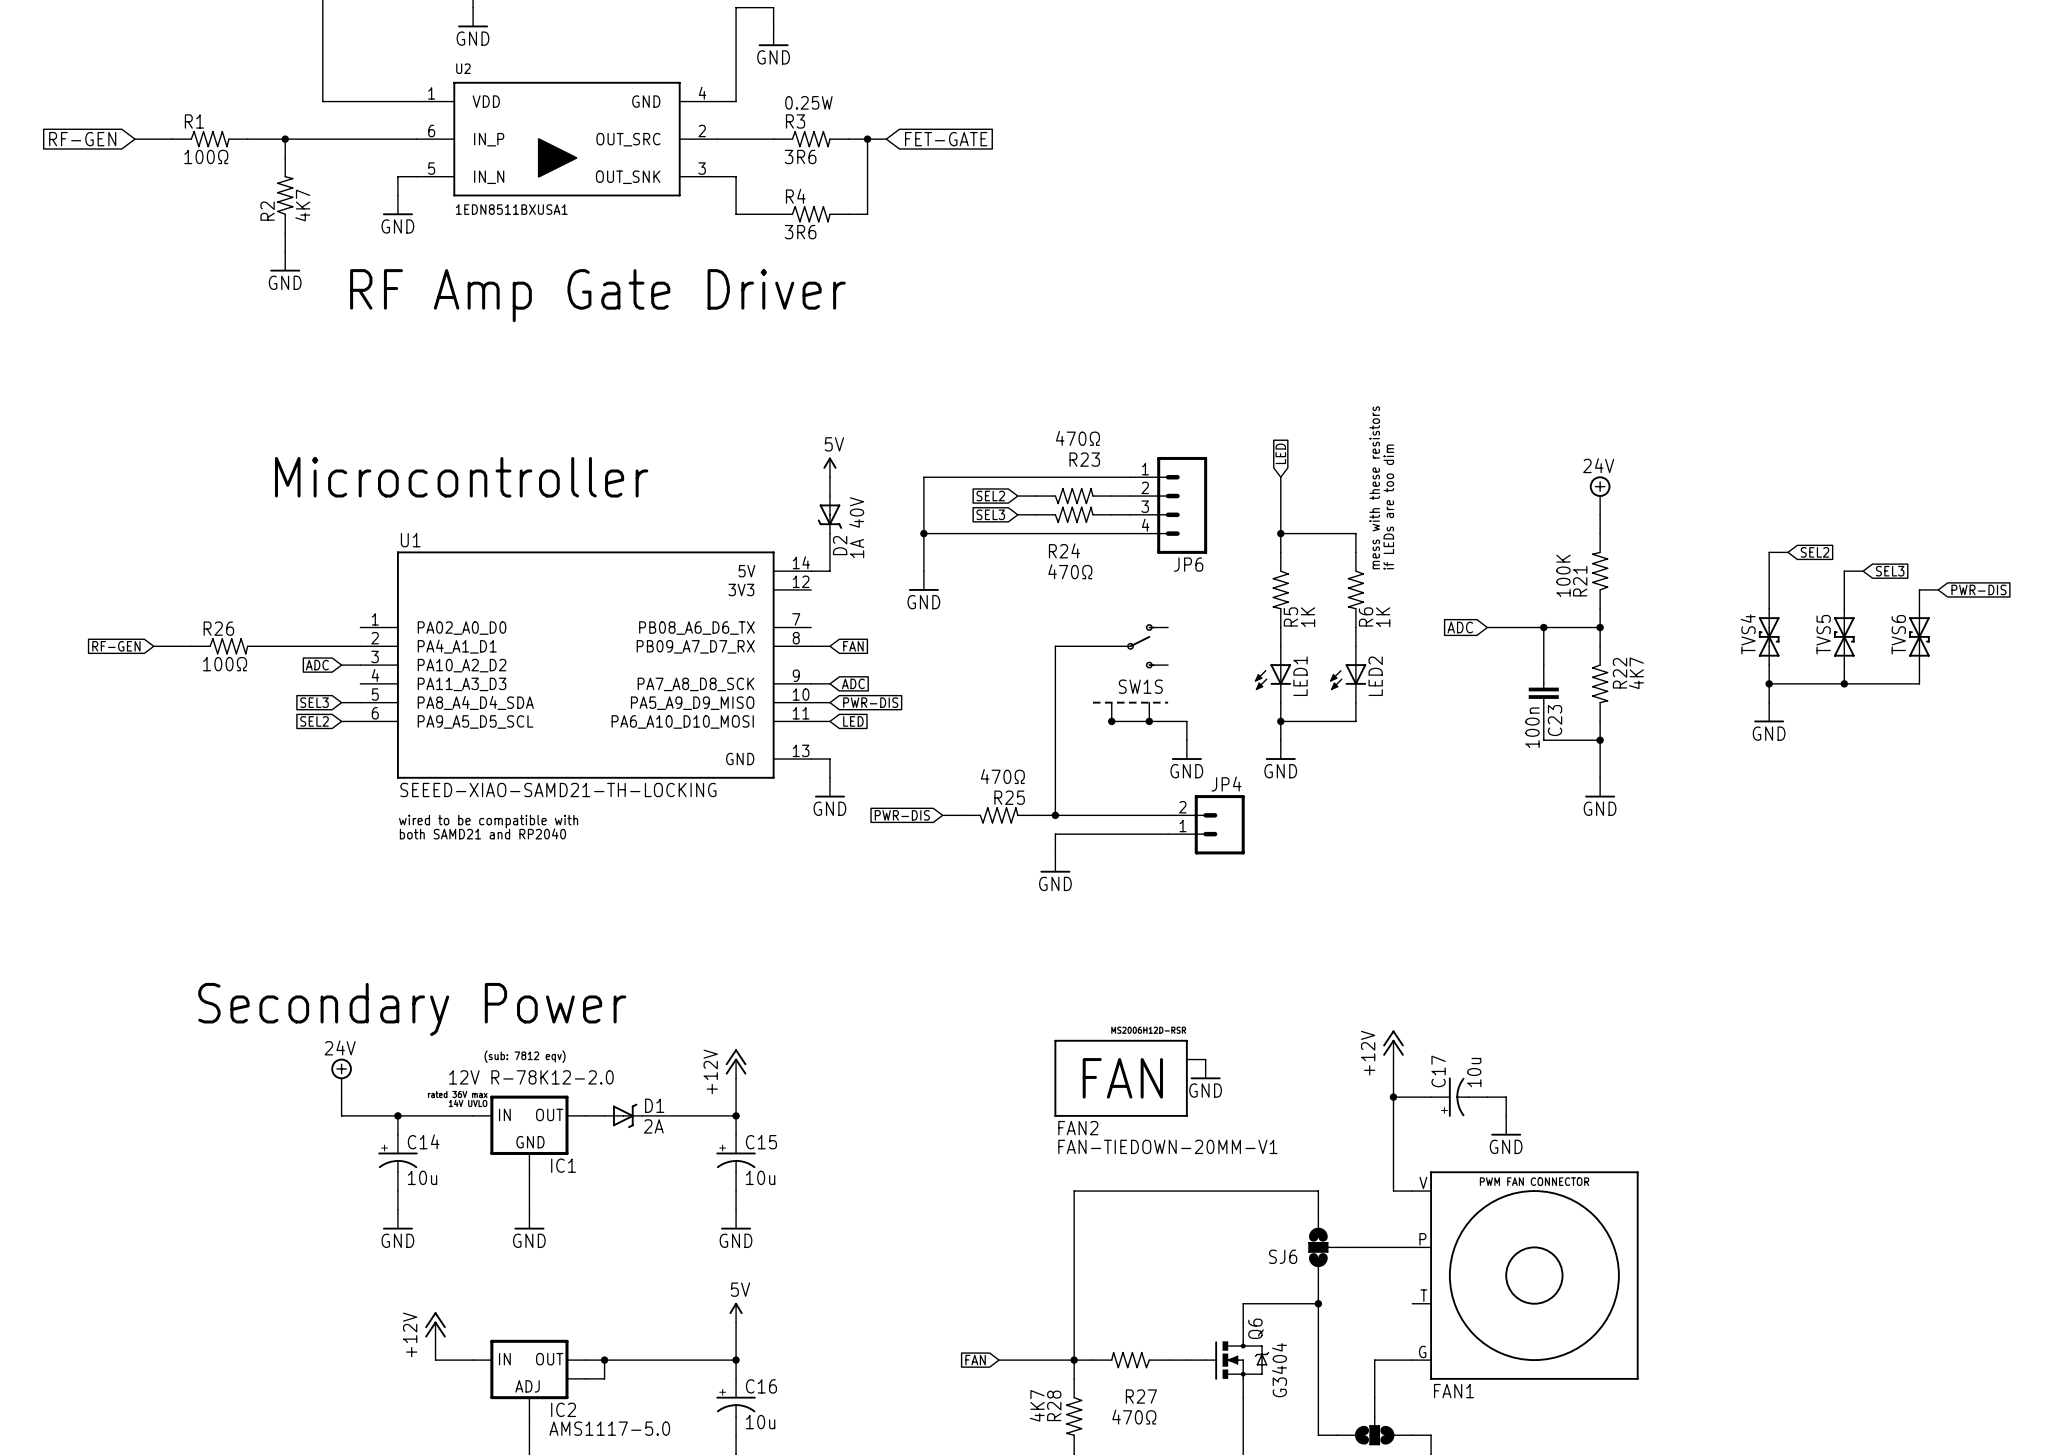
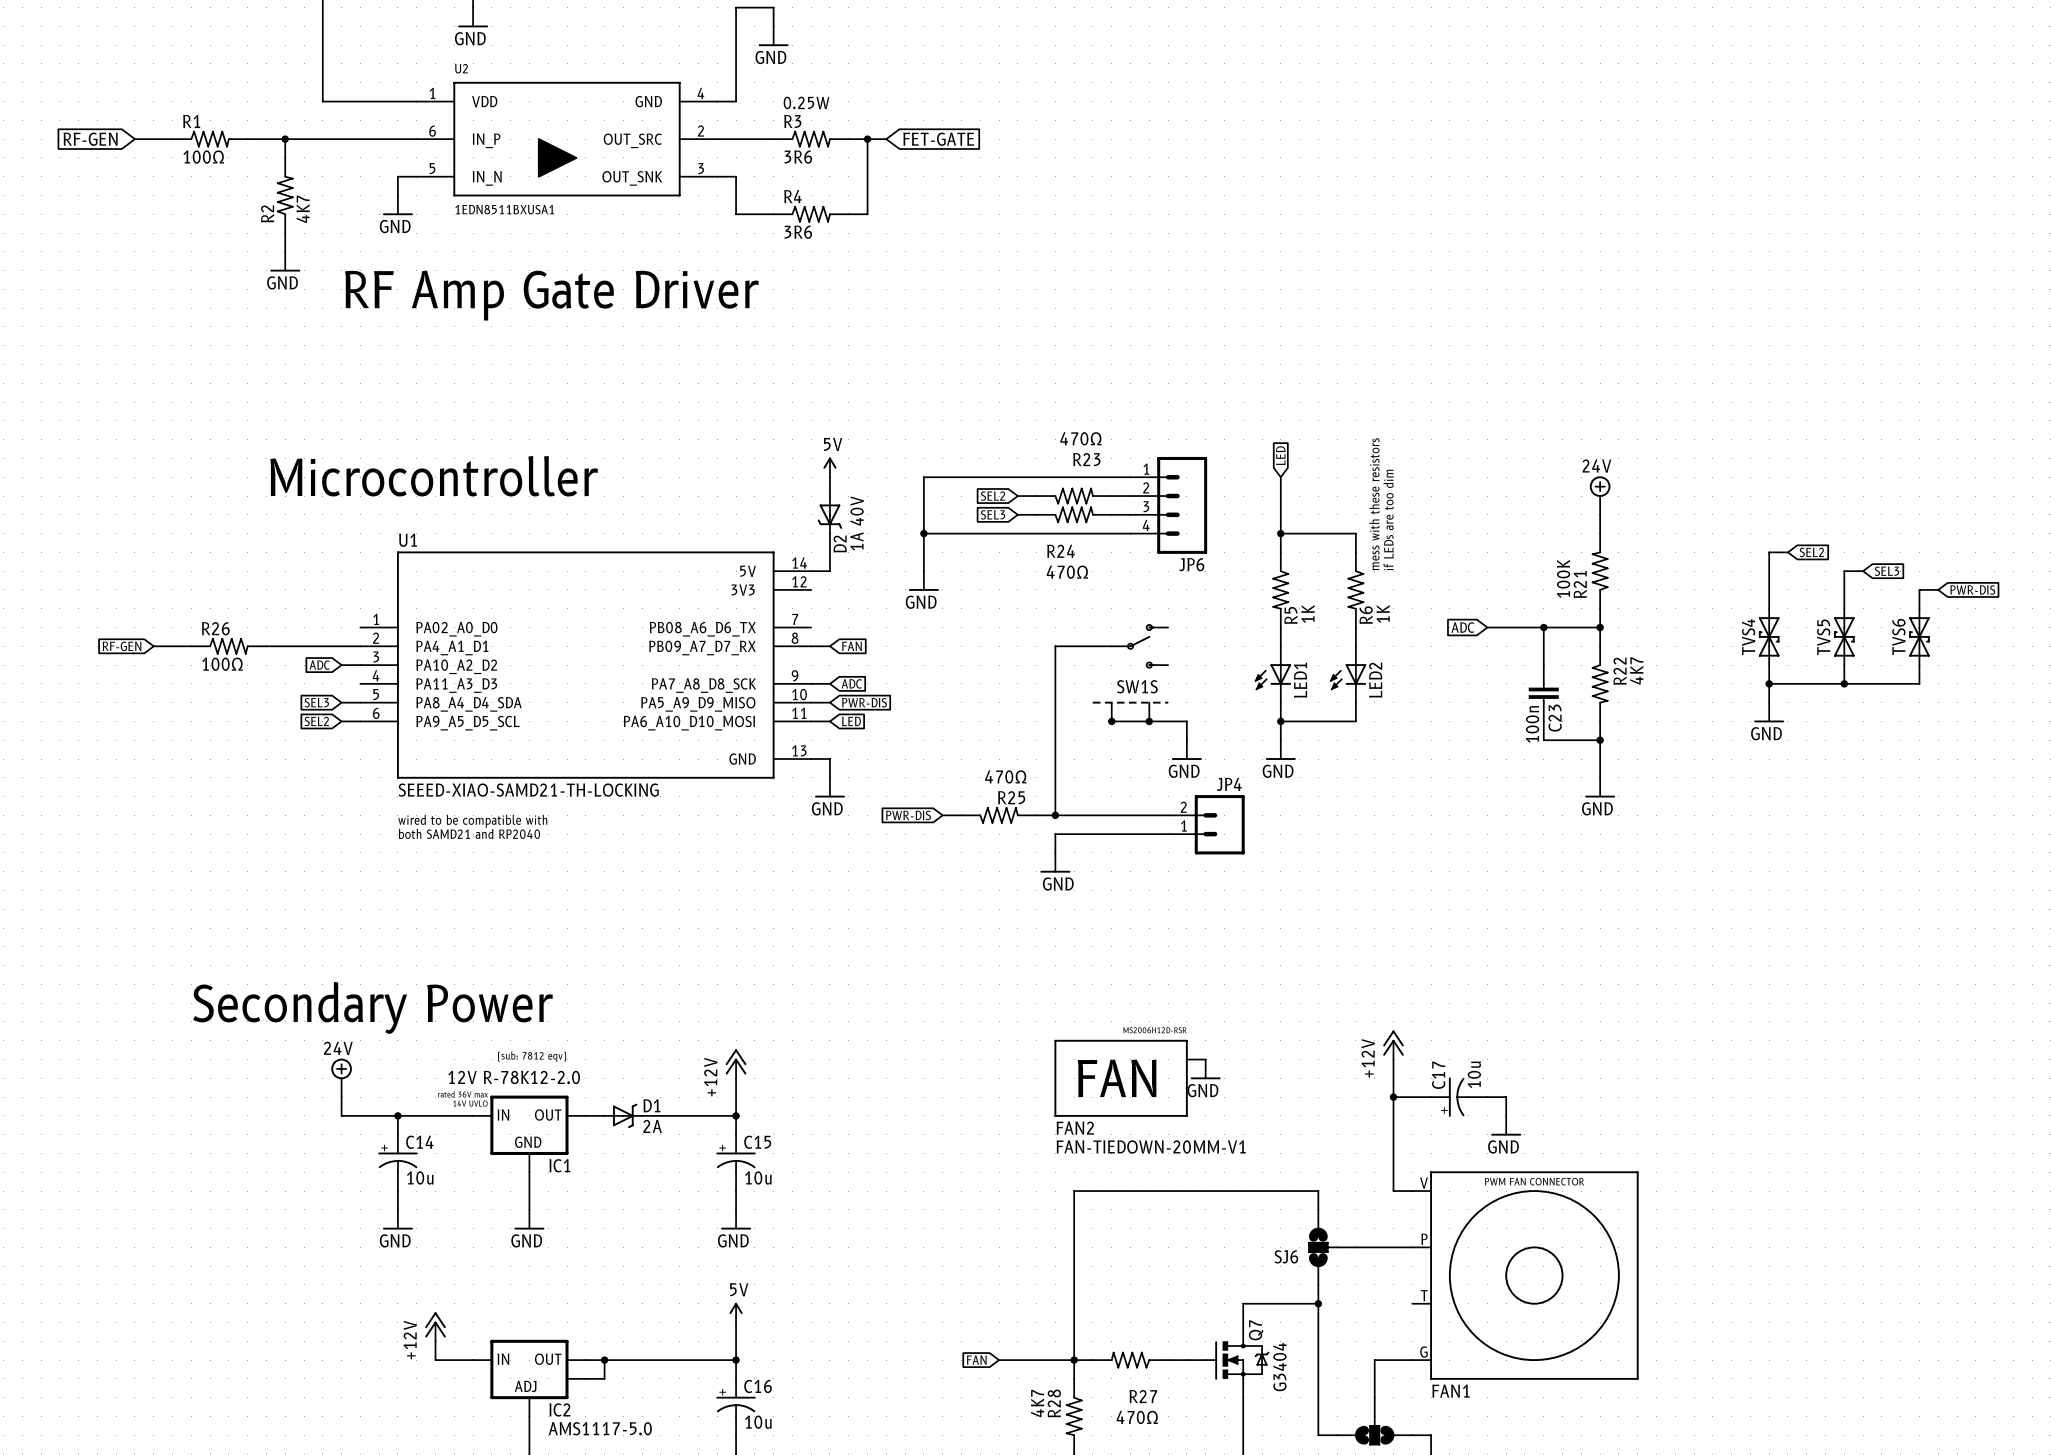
Q6 name: Q6 (1256, 1328) -> Q7 (1256, 1330)

